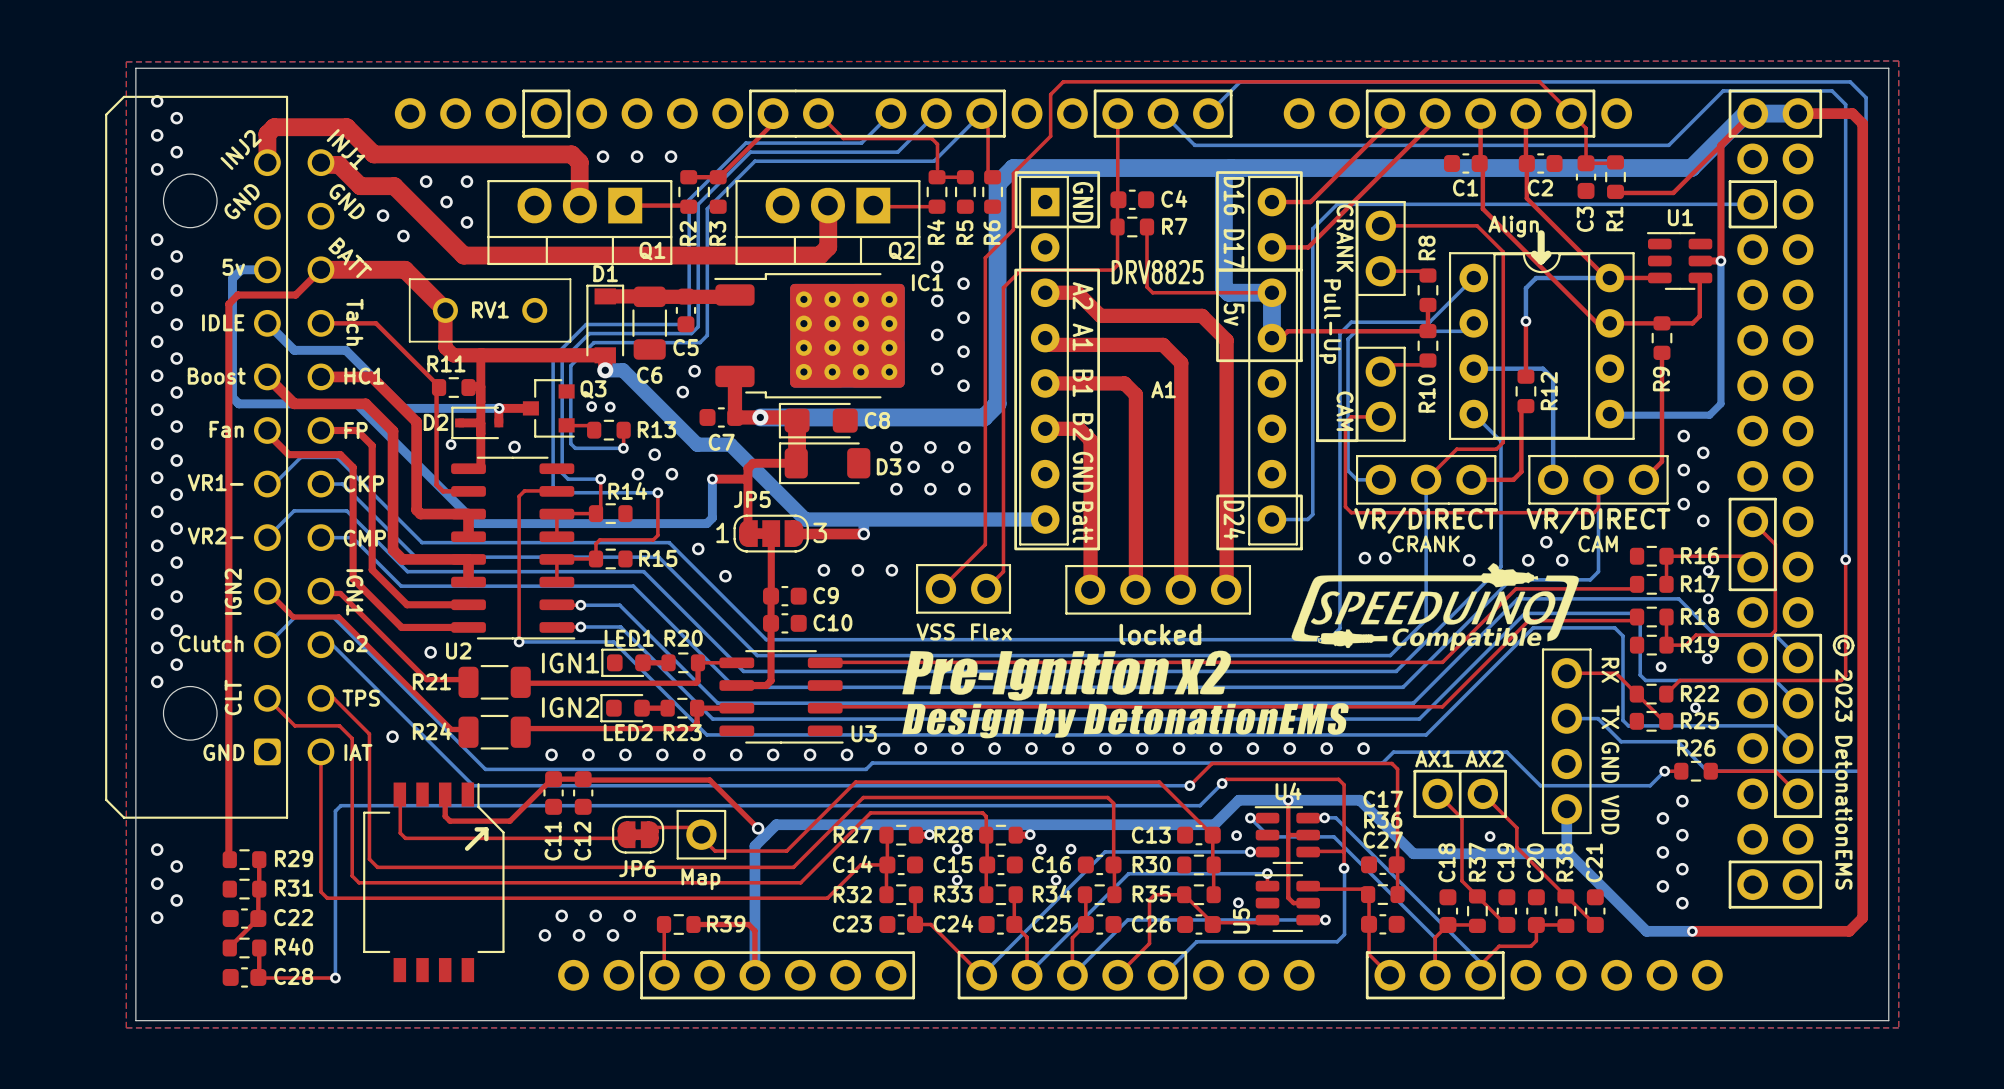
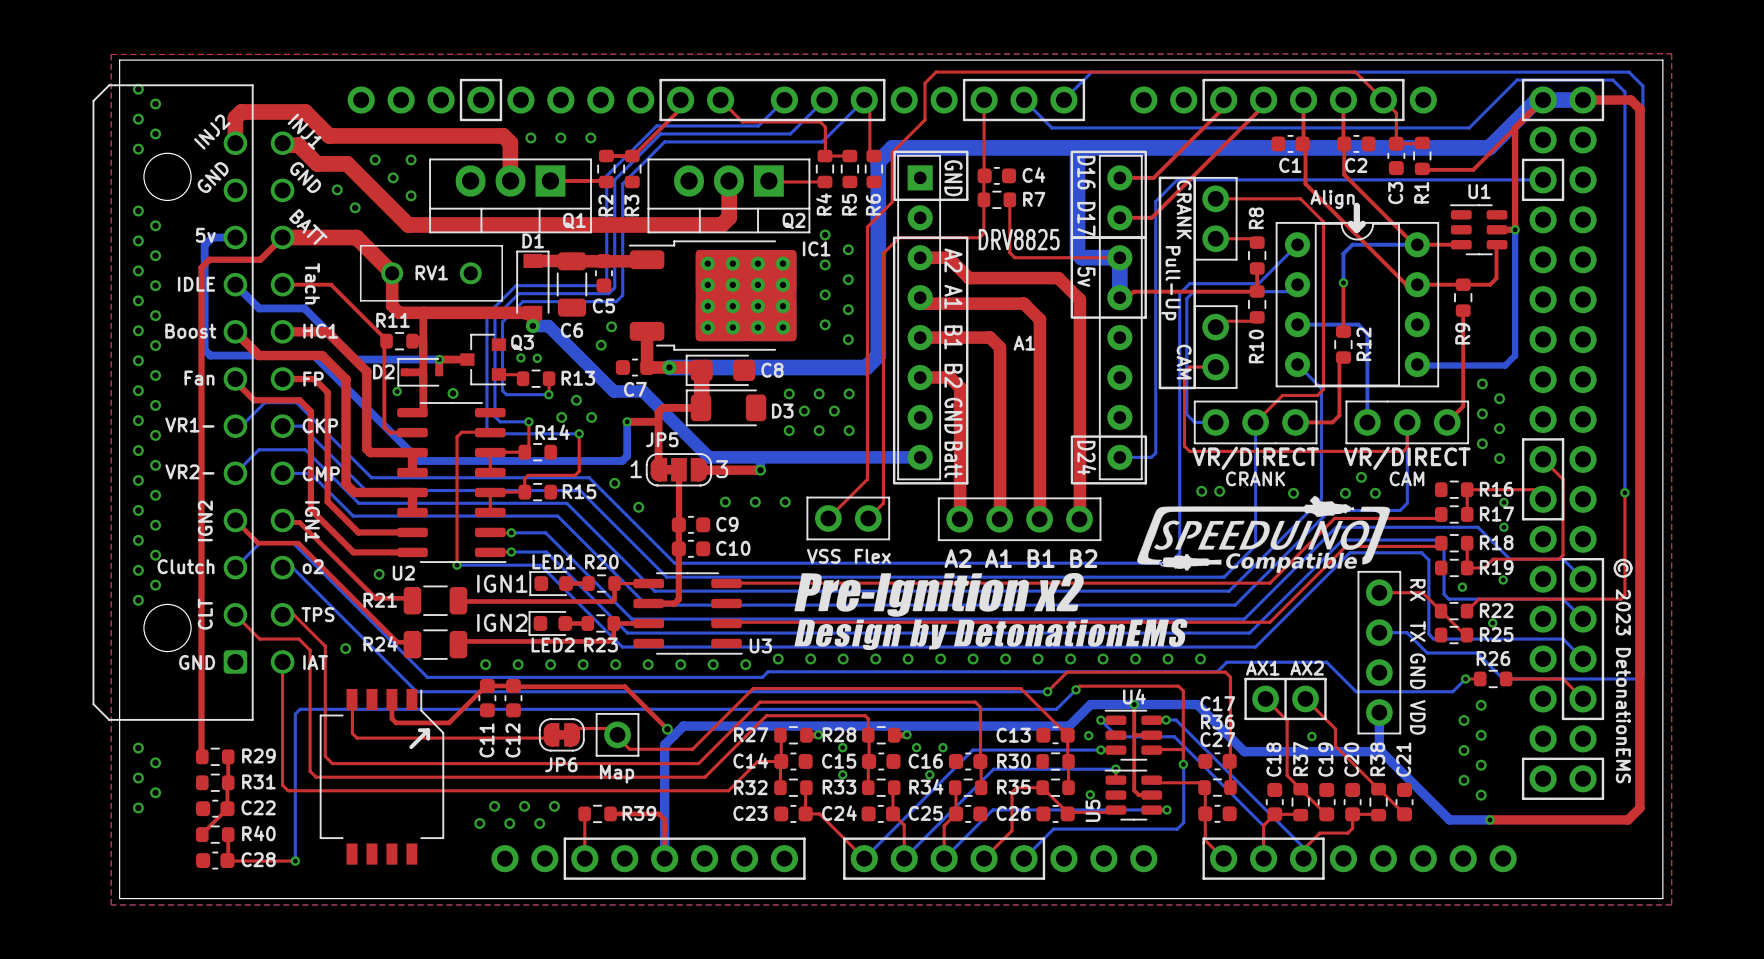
text: locked (1160, 634) -> A2 A1 B1 B2 (1020, 558)

